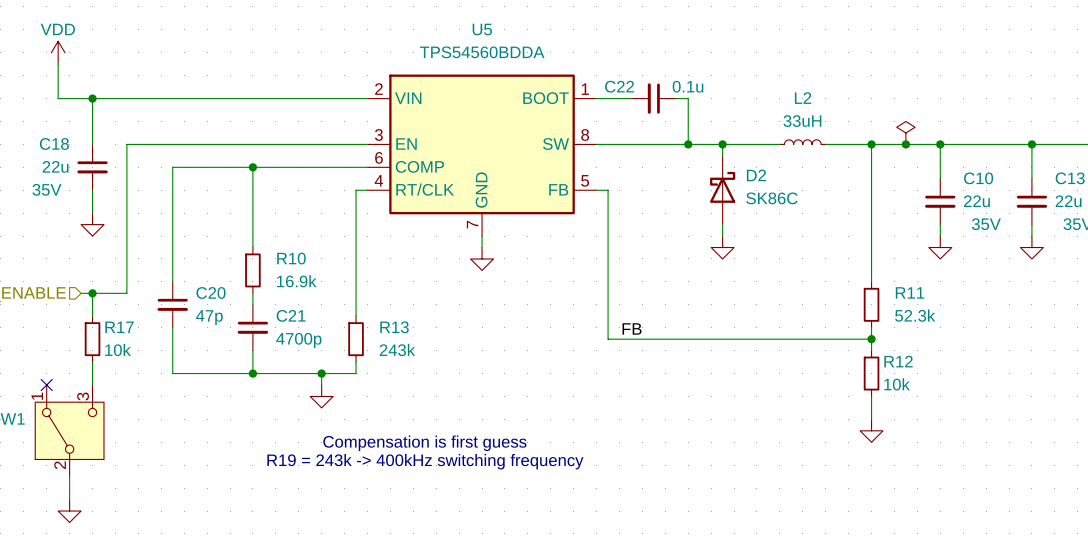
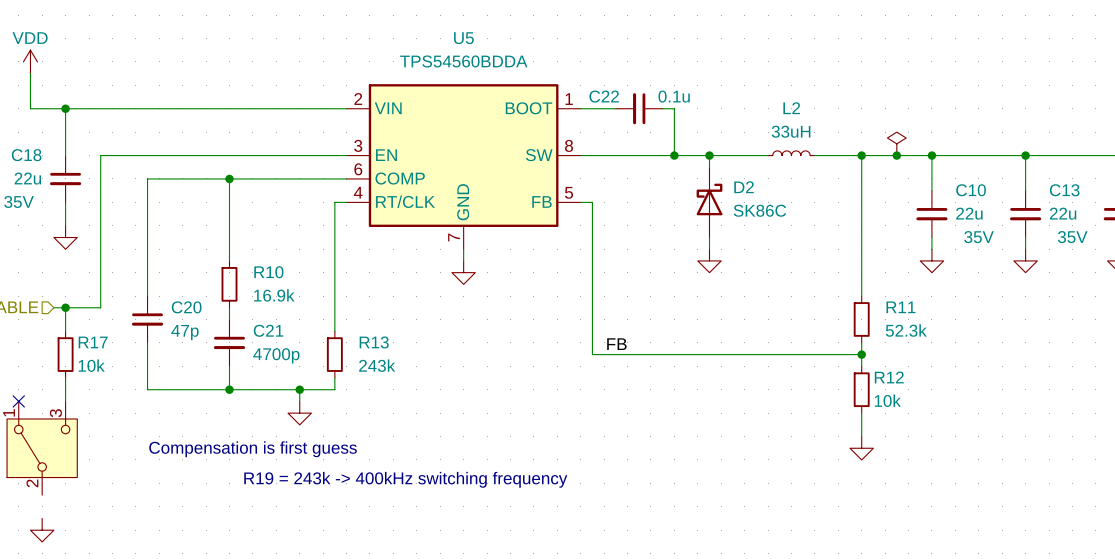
text position: Compensation is first guess (424, 443) -> Compensation is first guess (253, 449)
wire: (69, 476) (69, 499) -> none

